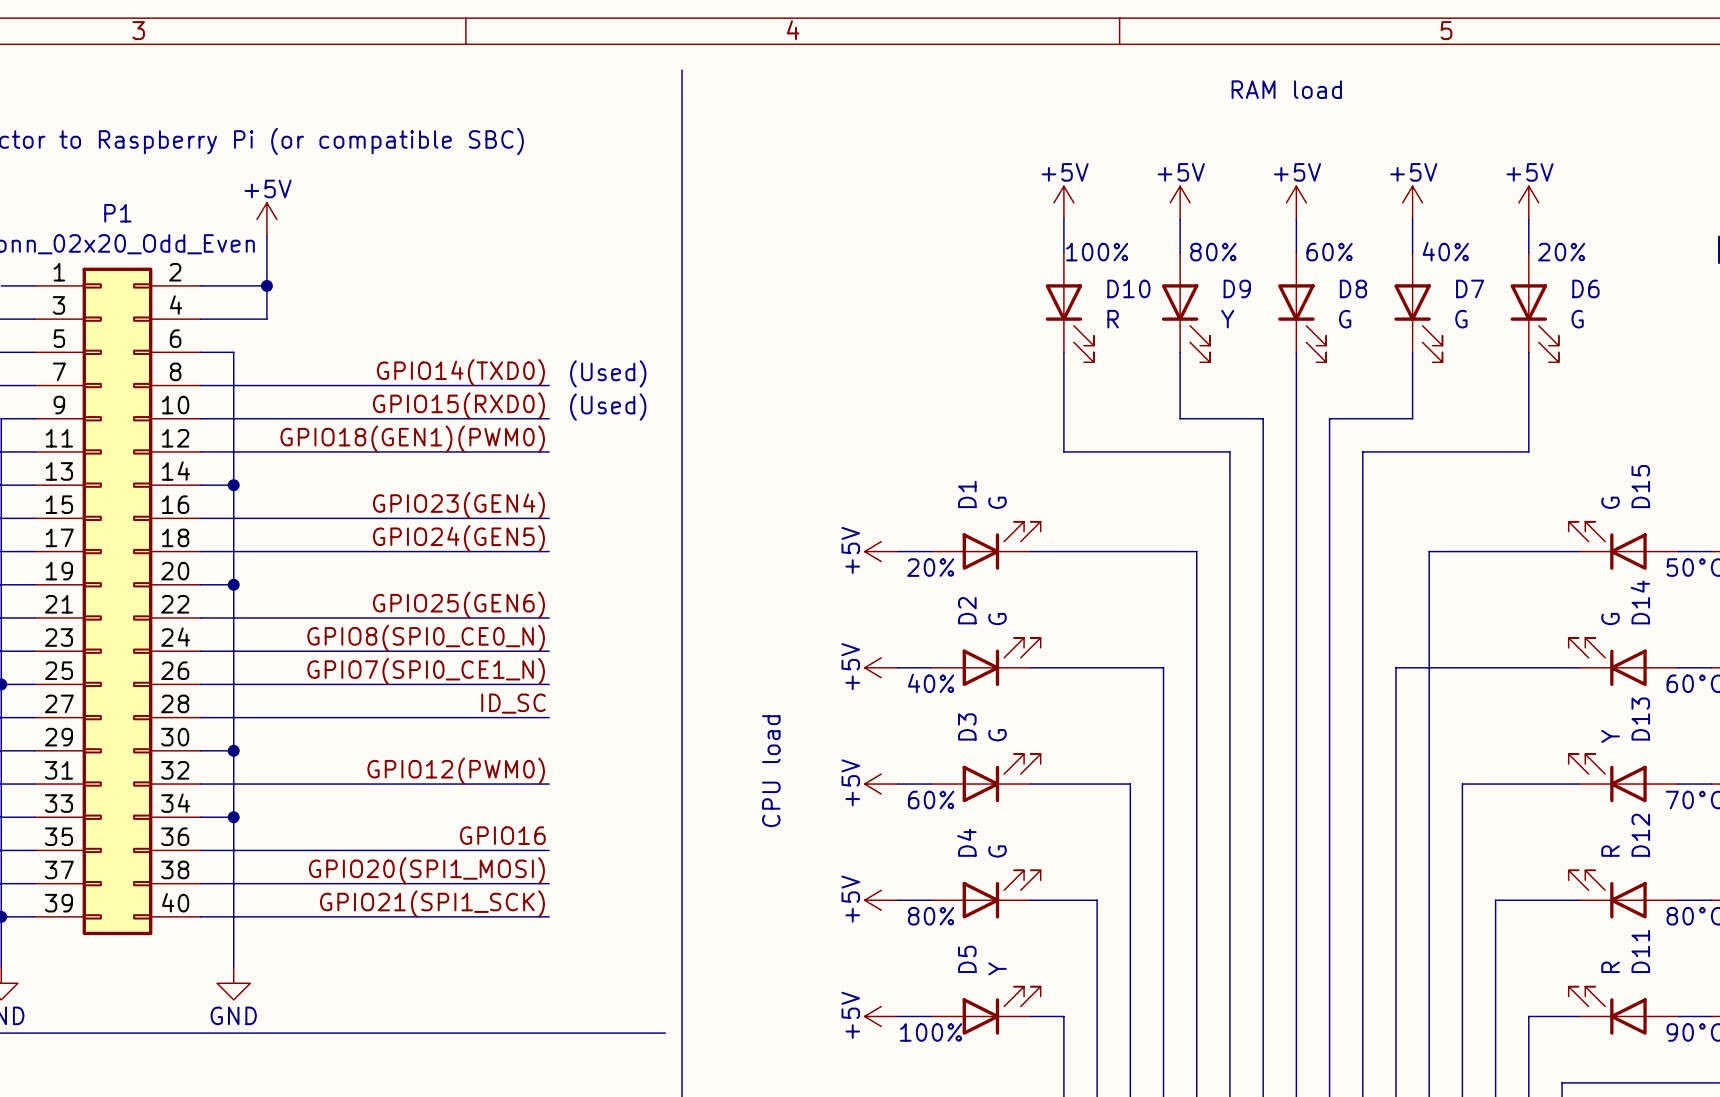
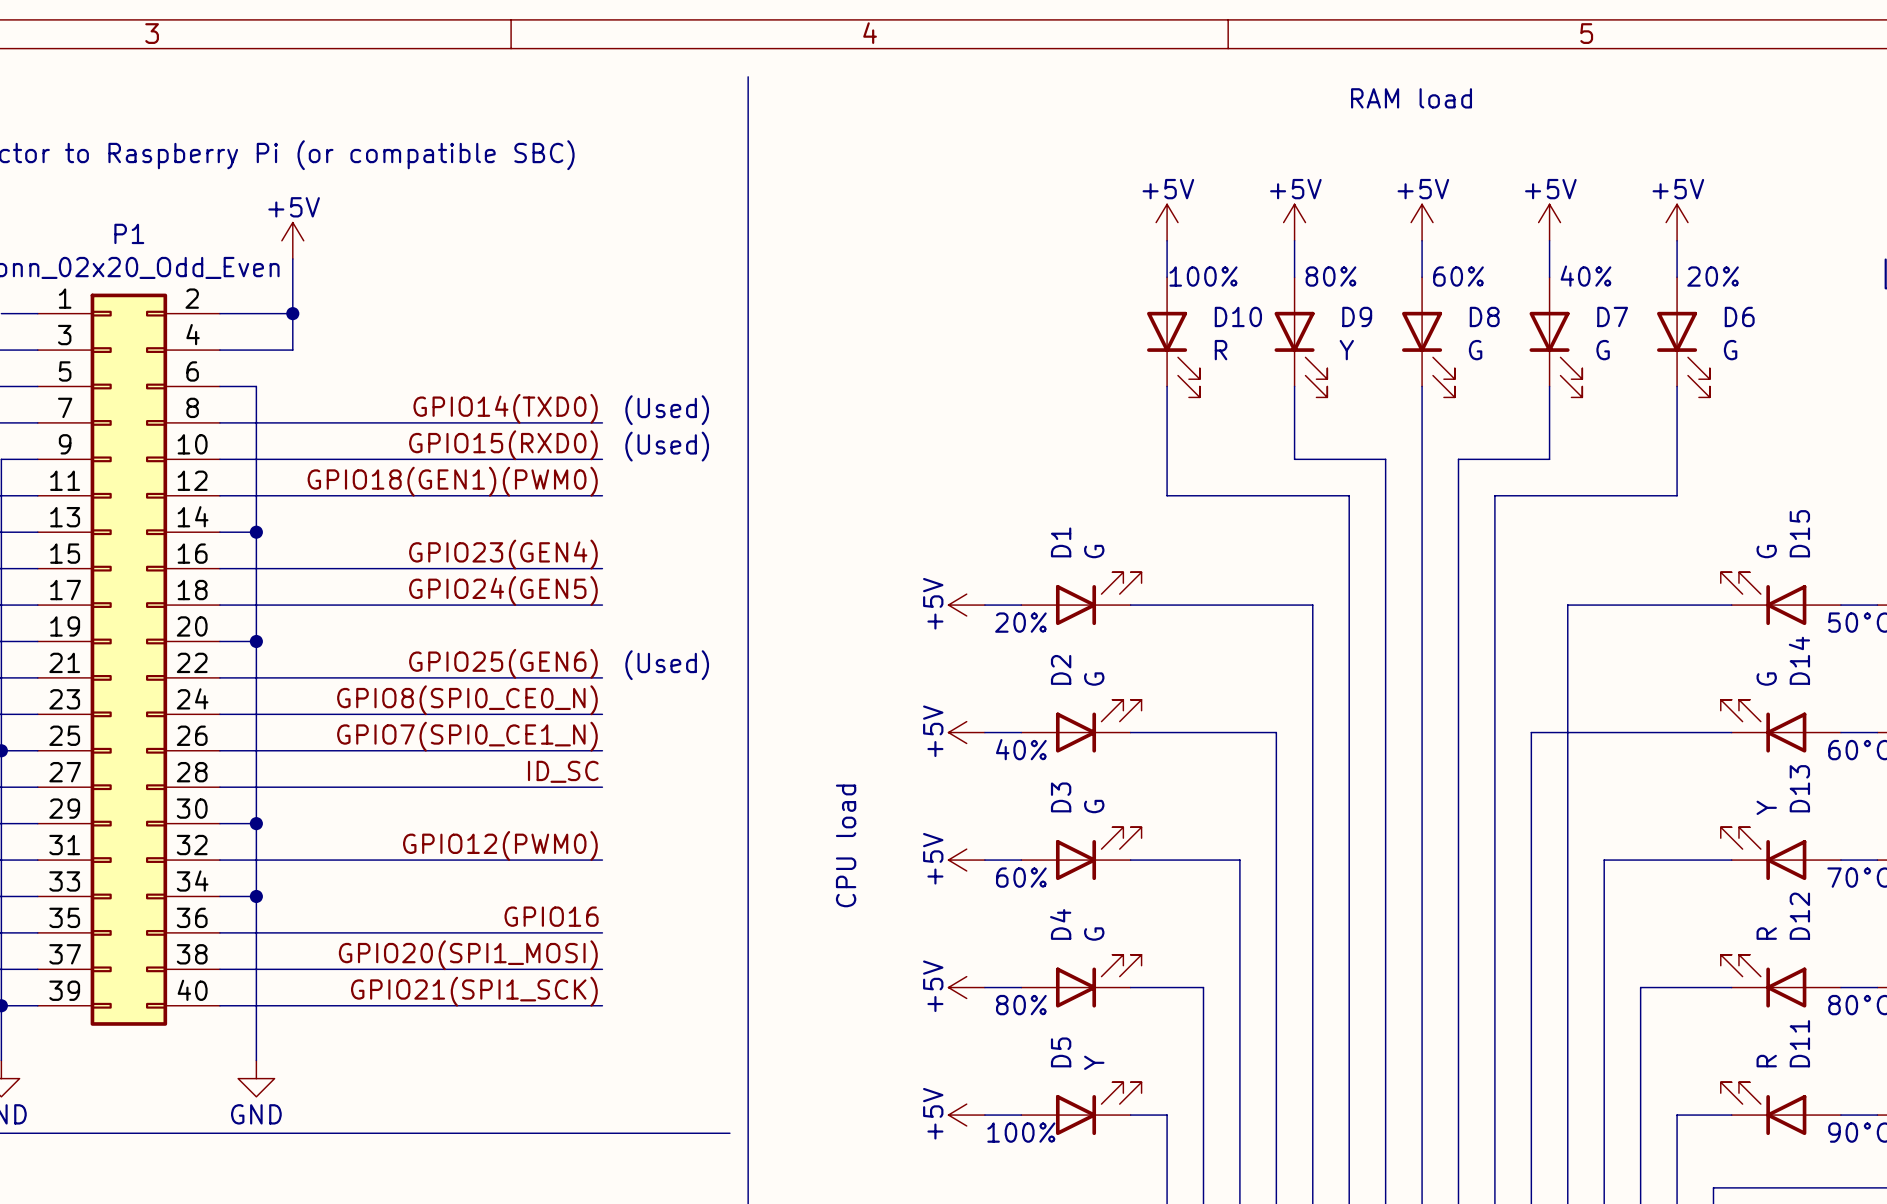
text: none -> (Used) (667, 665)

